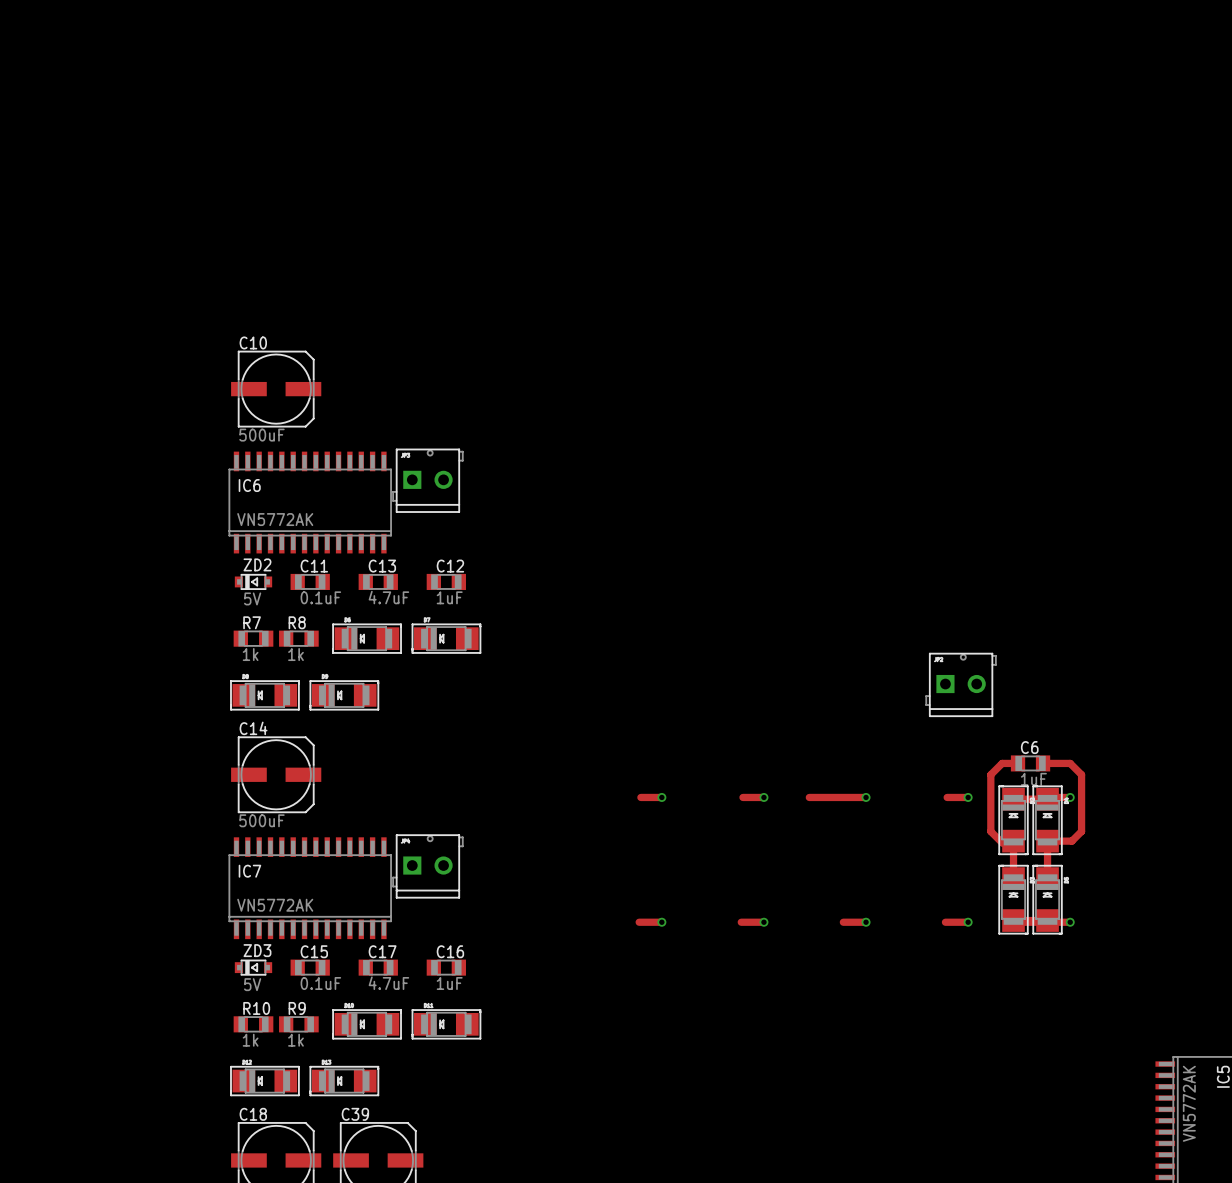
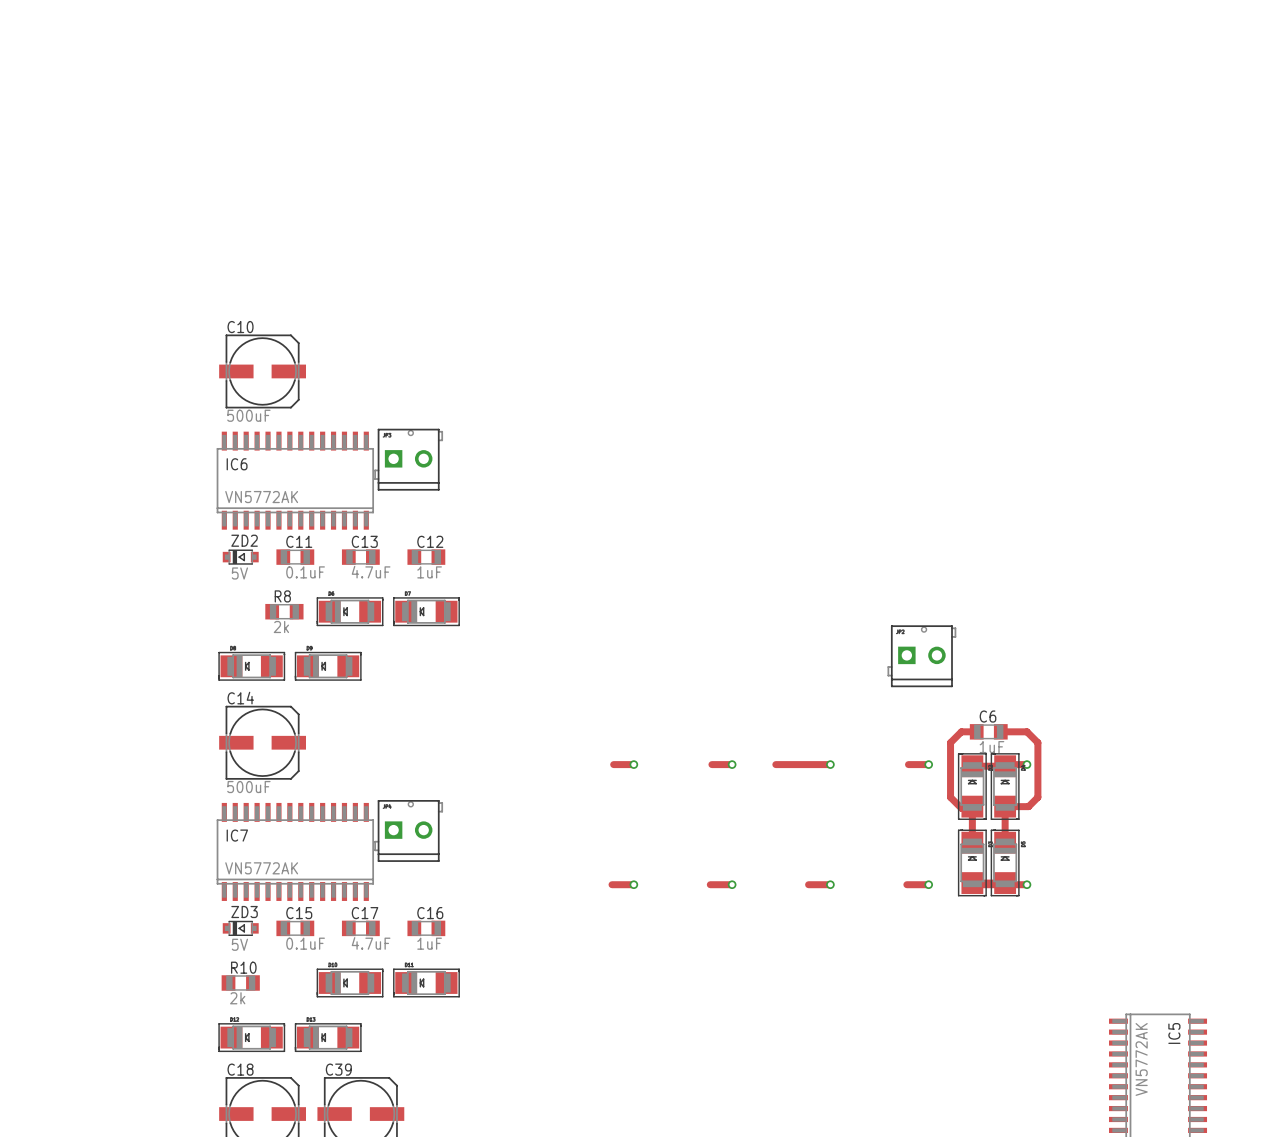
R7: 1k (253, 638) -> none
R8 value: 1k (295, 654) -> 2k (281, 626)
R9: 1k (298, 1024) -> none
R10 value: 1k (250, 1040) -> 2k (237, 998)

